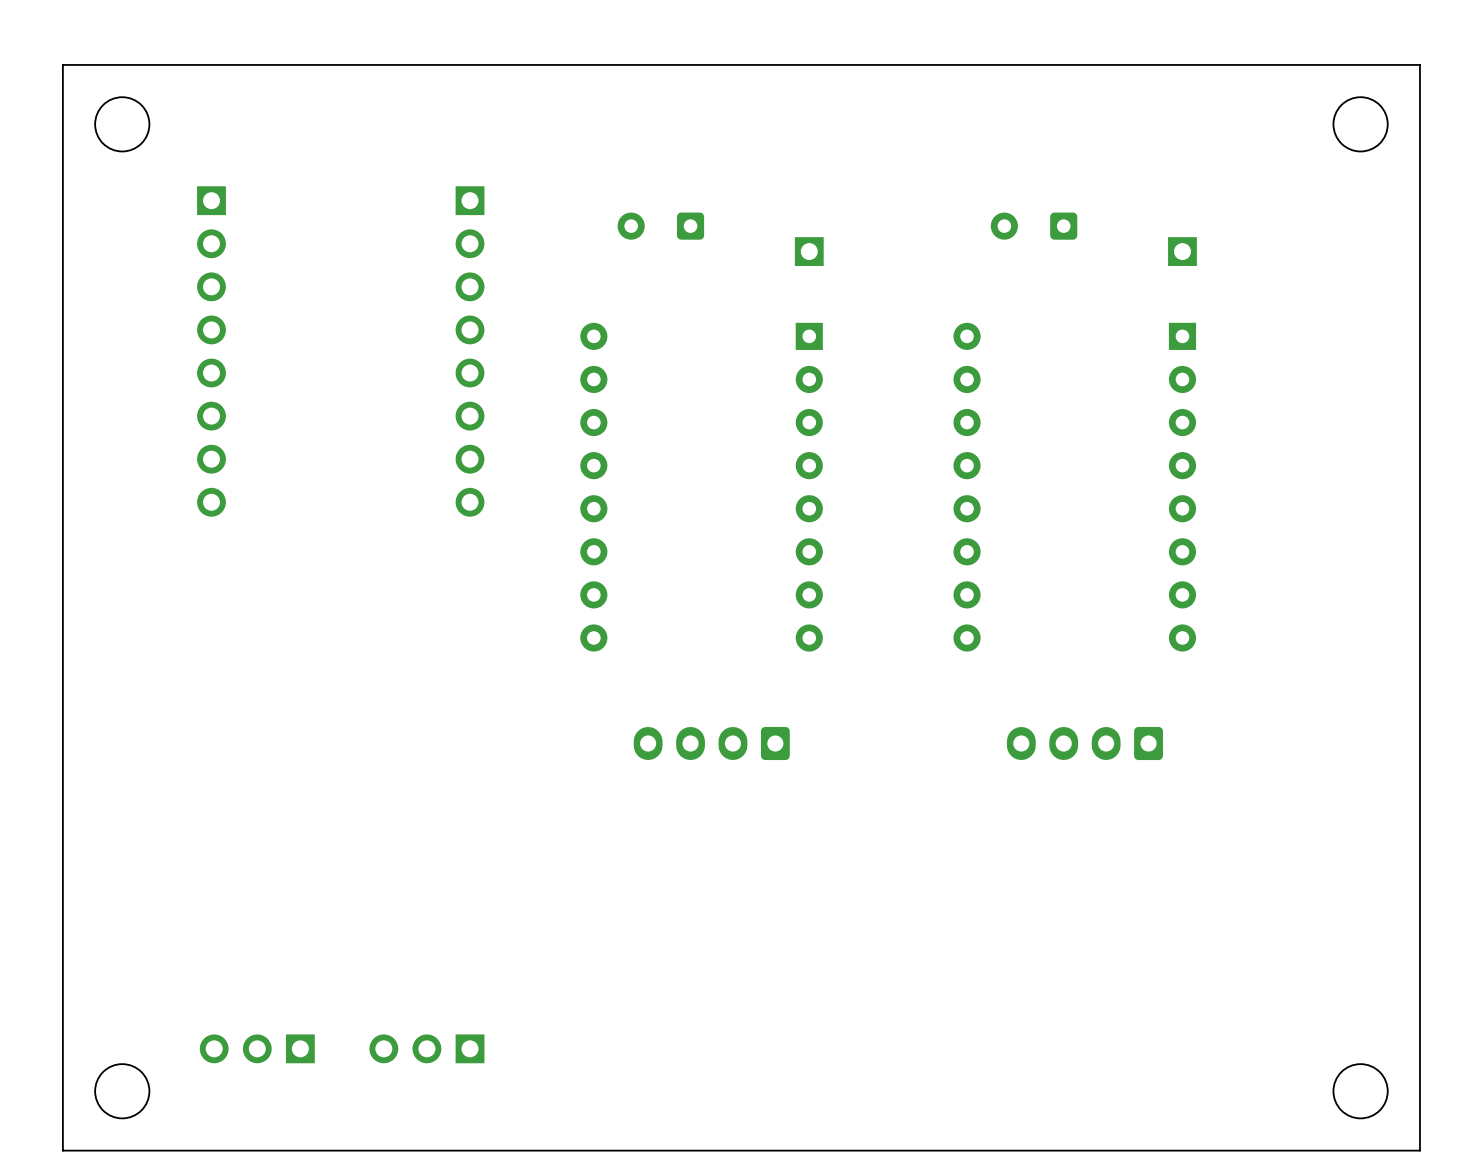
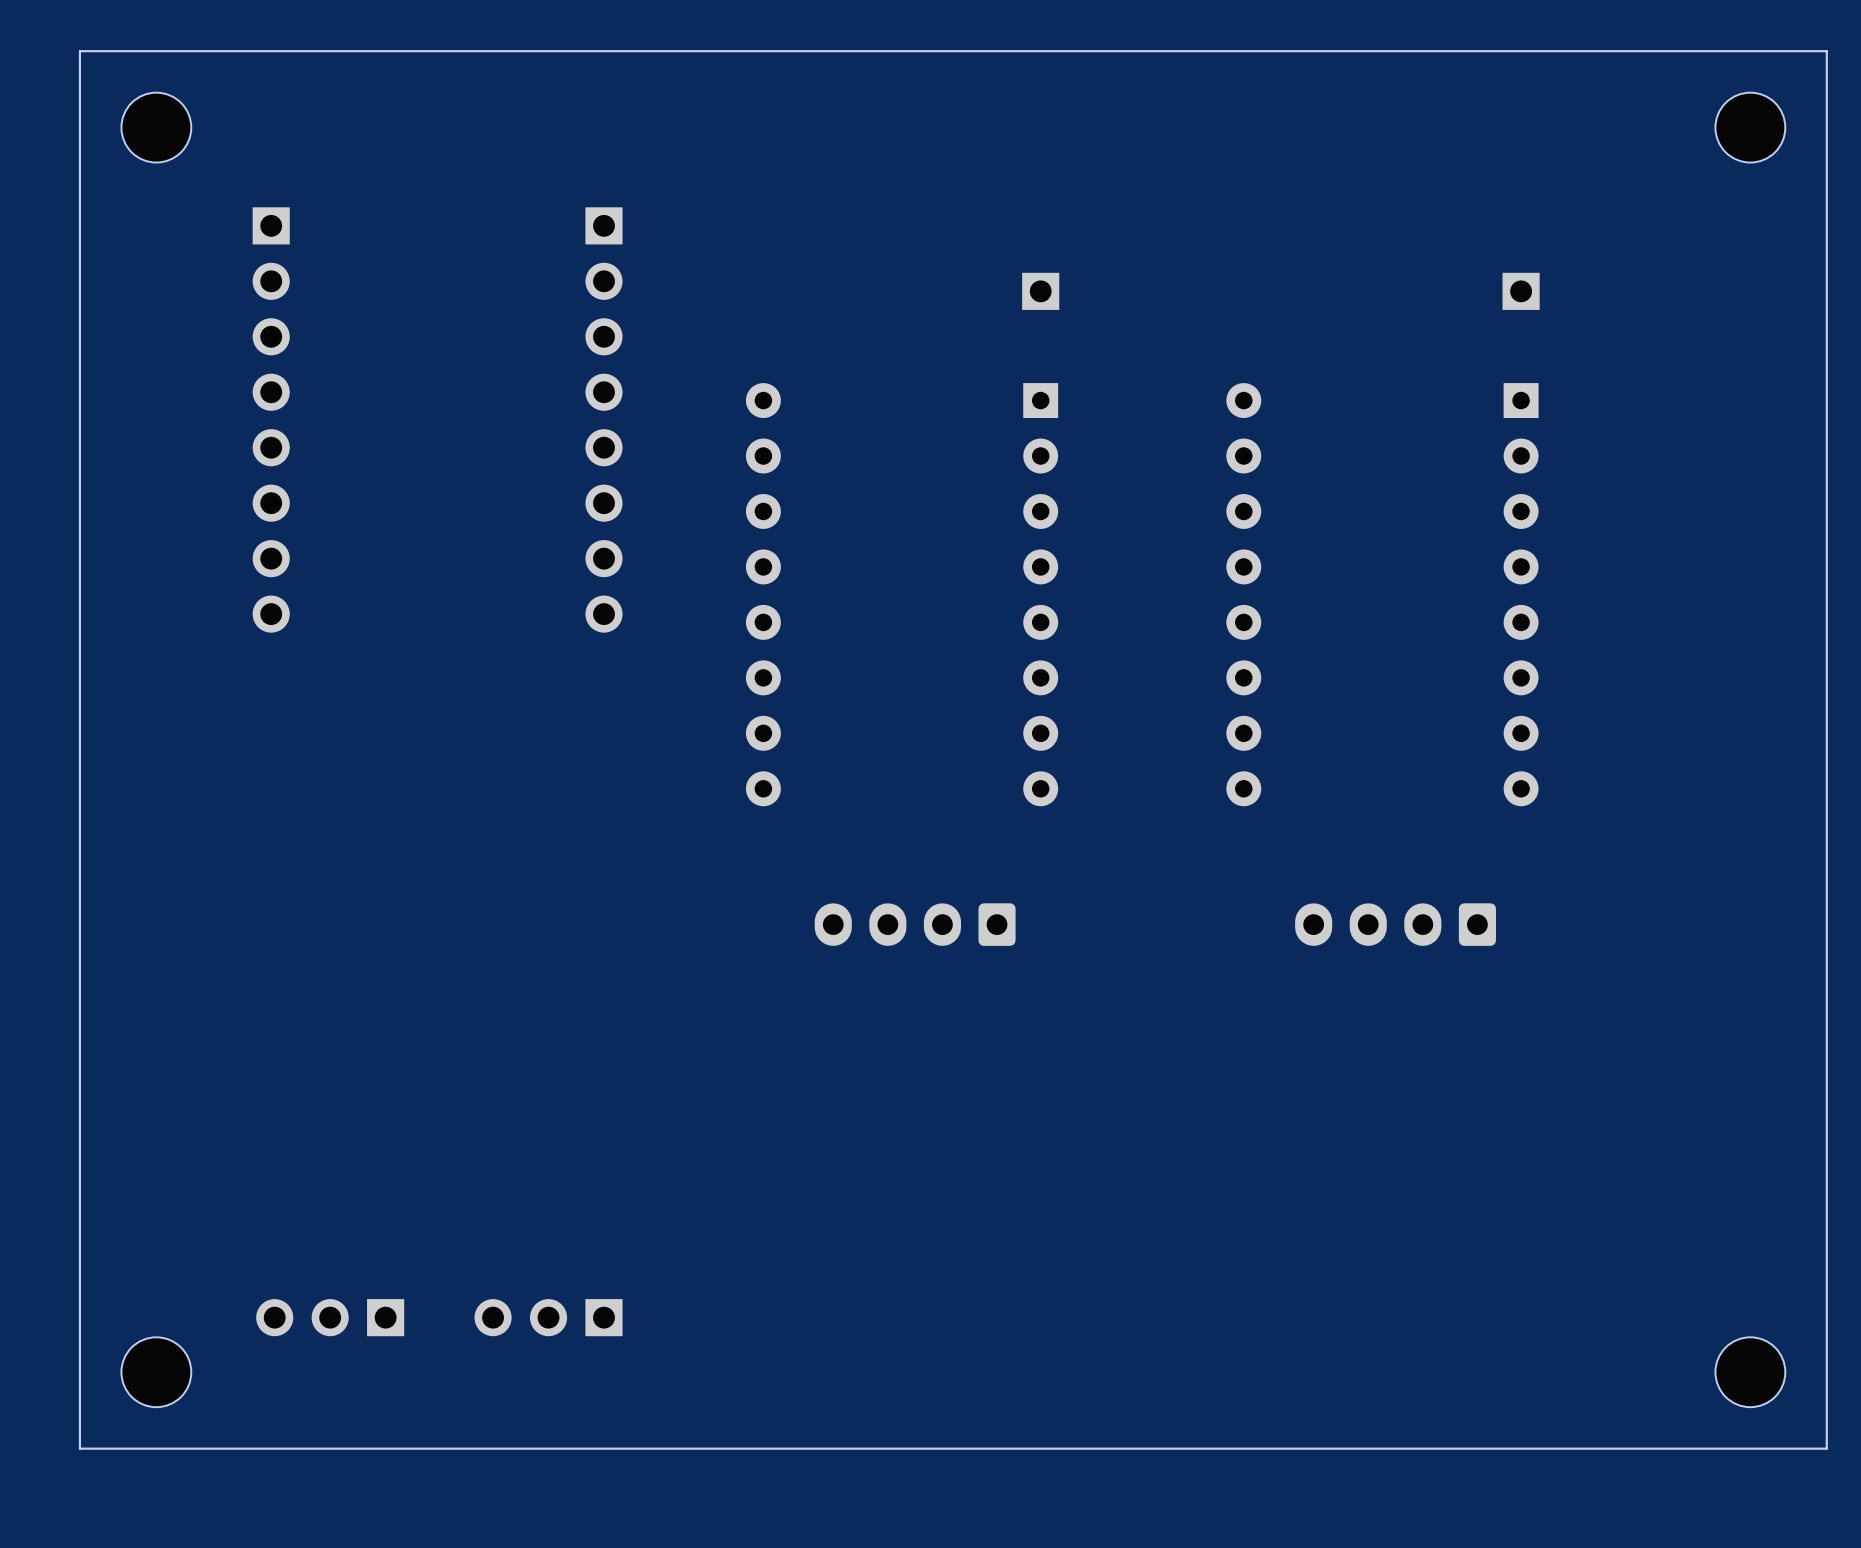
part: (660, 226) -> none
part: (1034, 226) -> none

